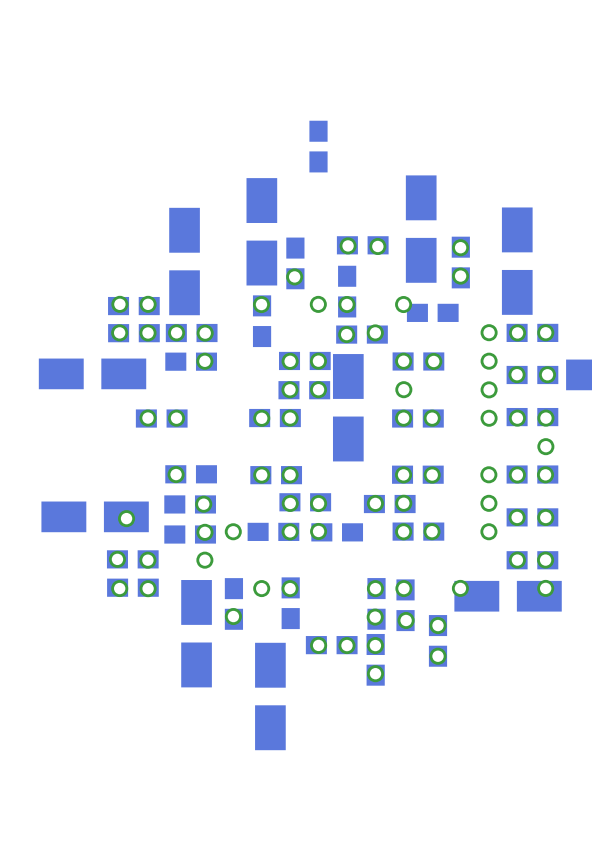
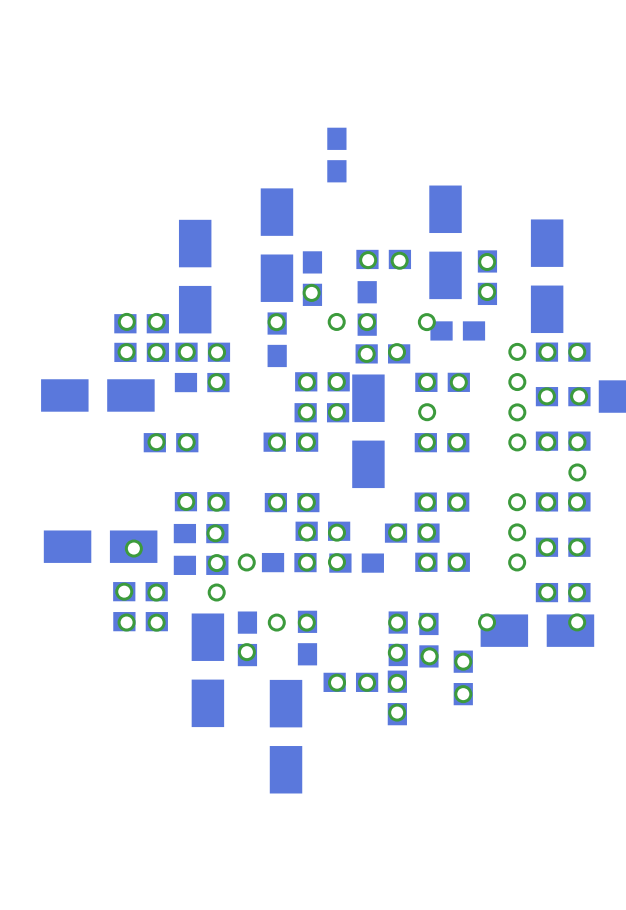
via: none -> (216, 502)

